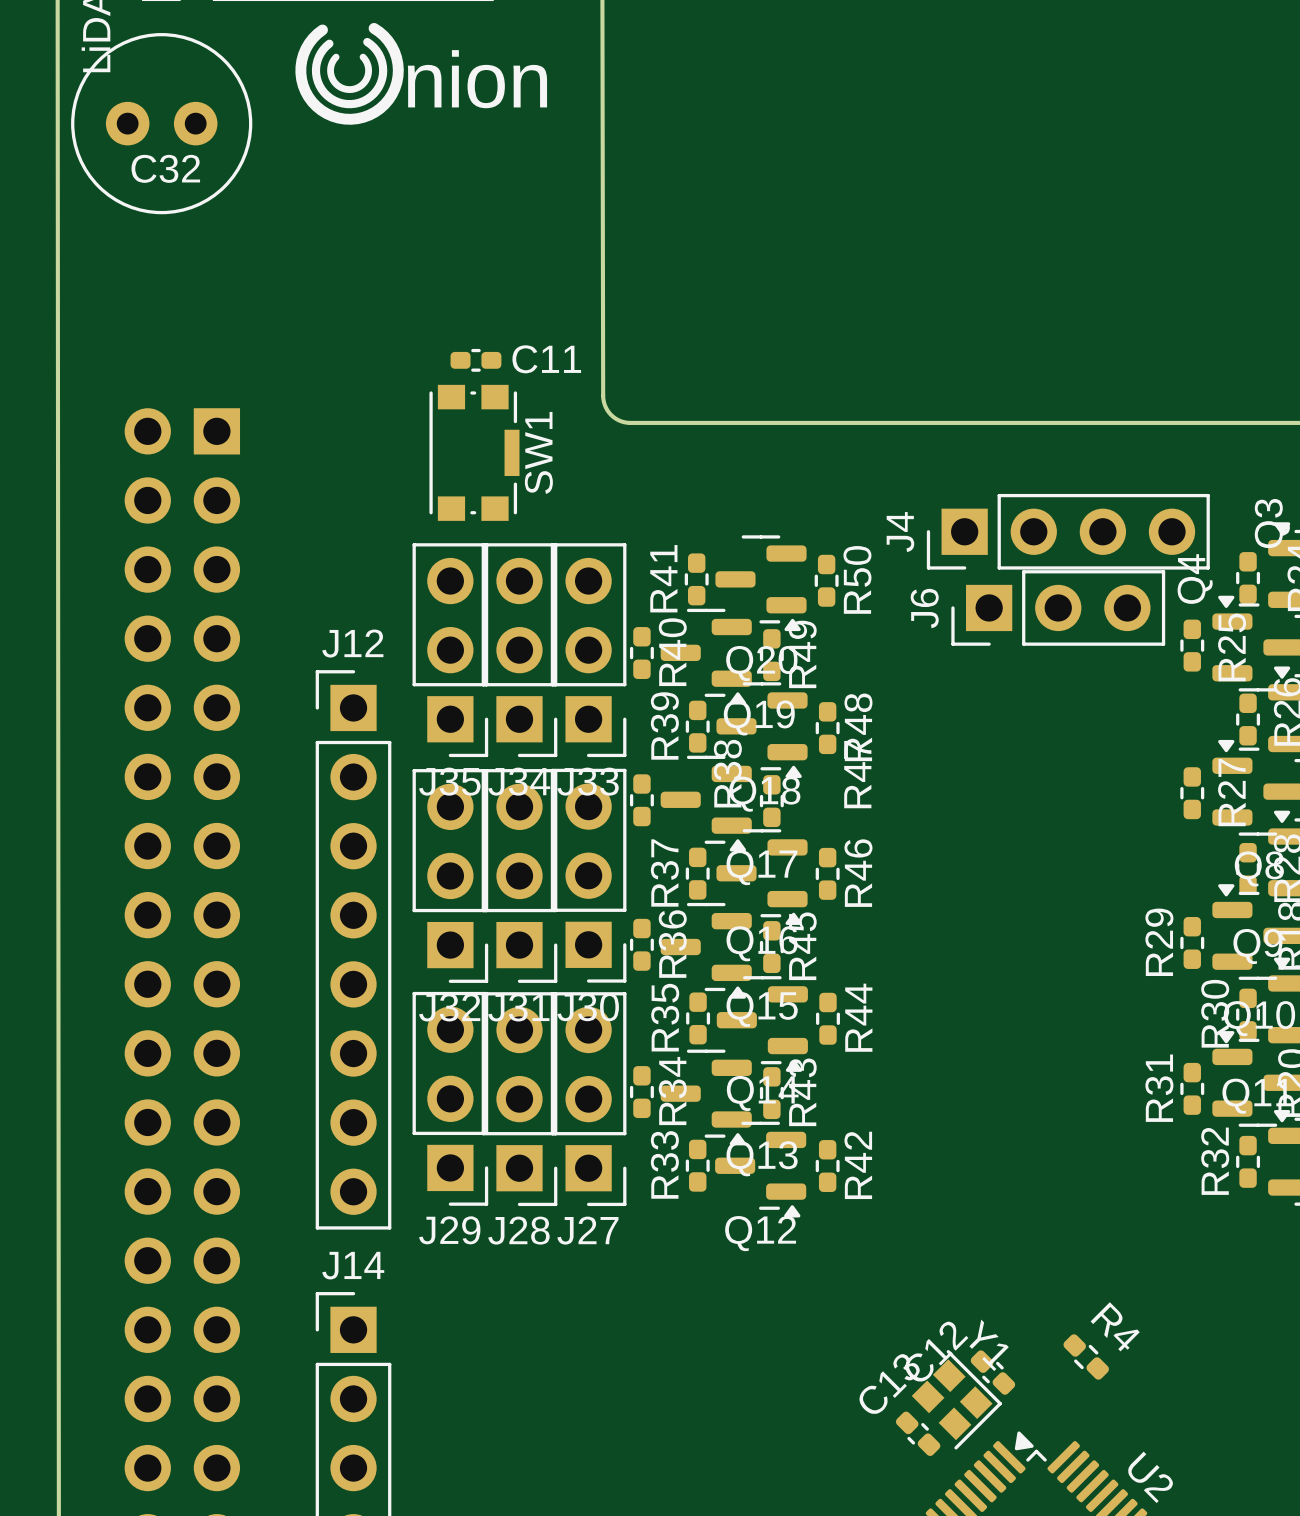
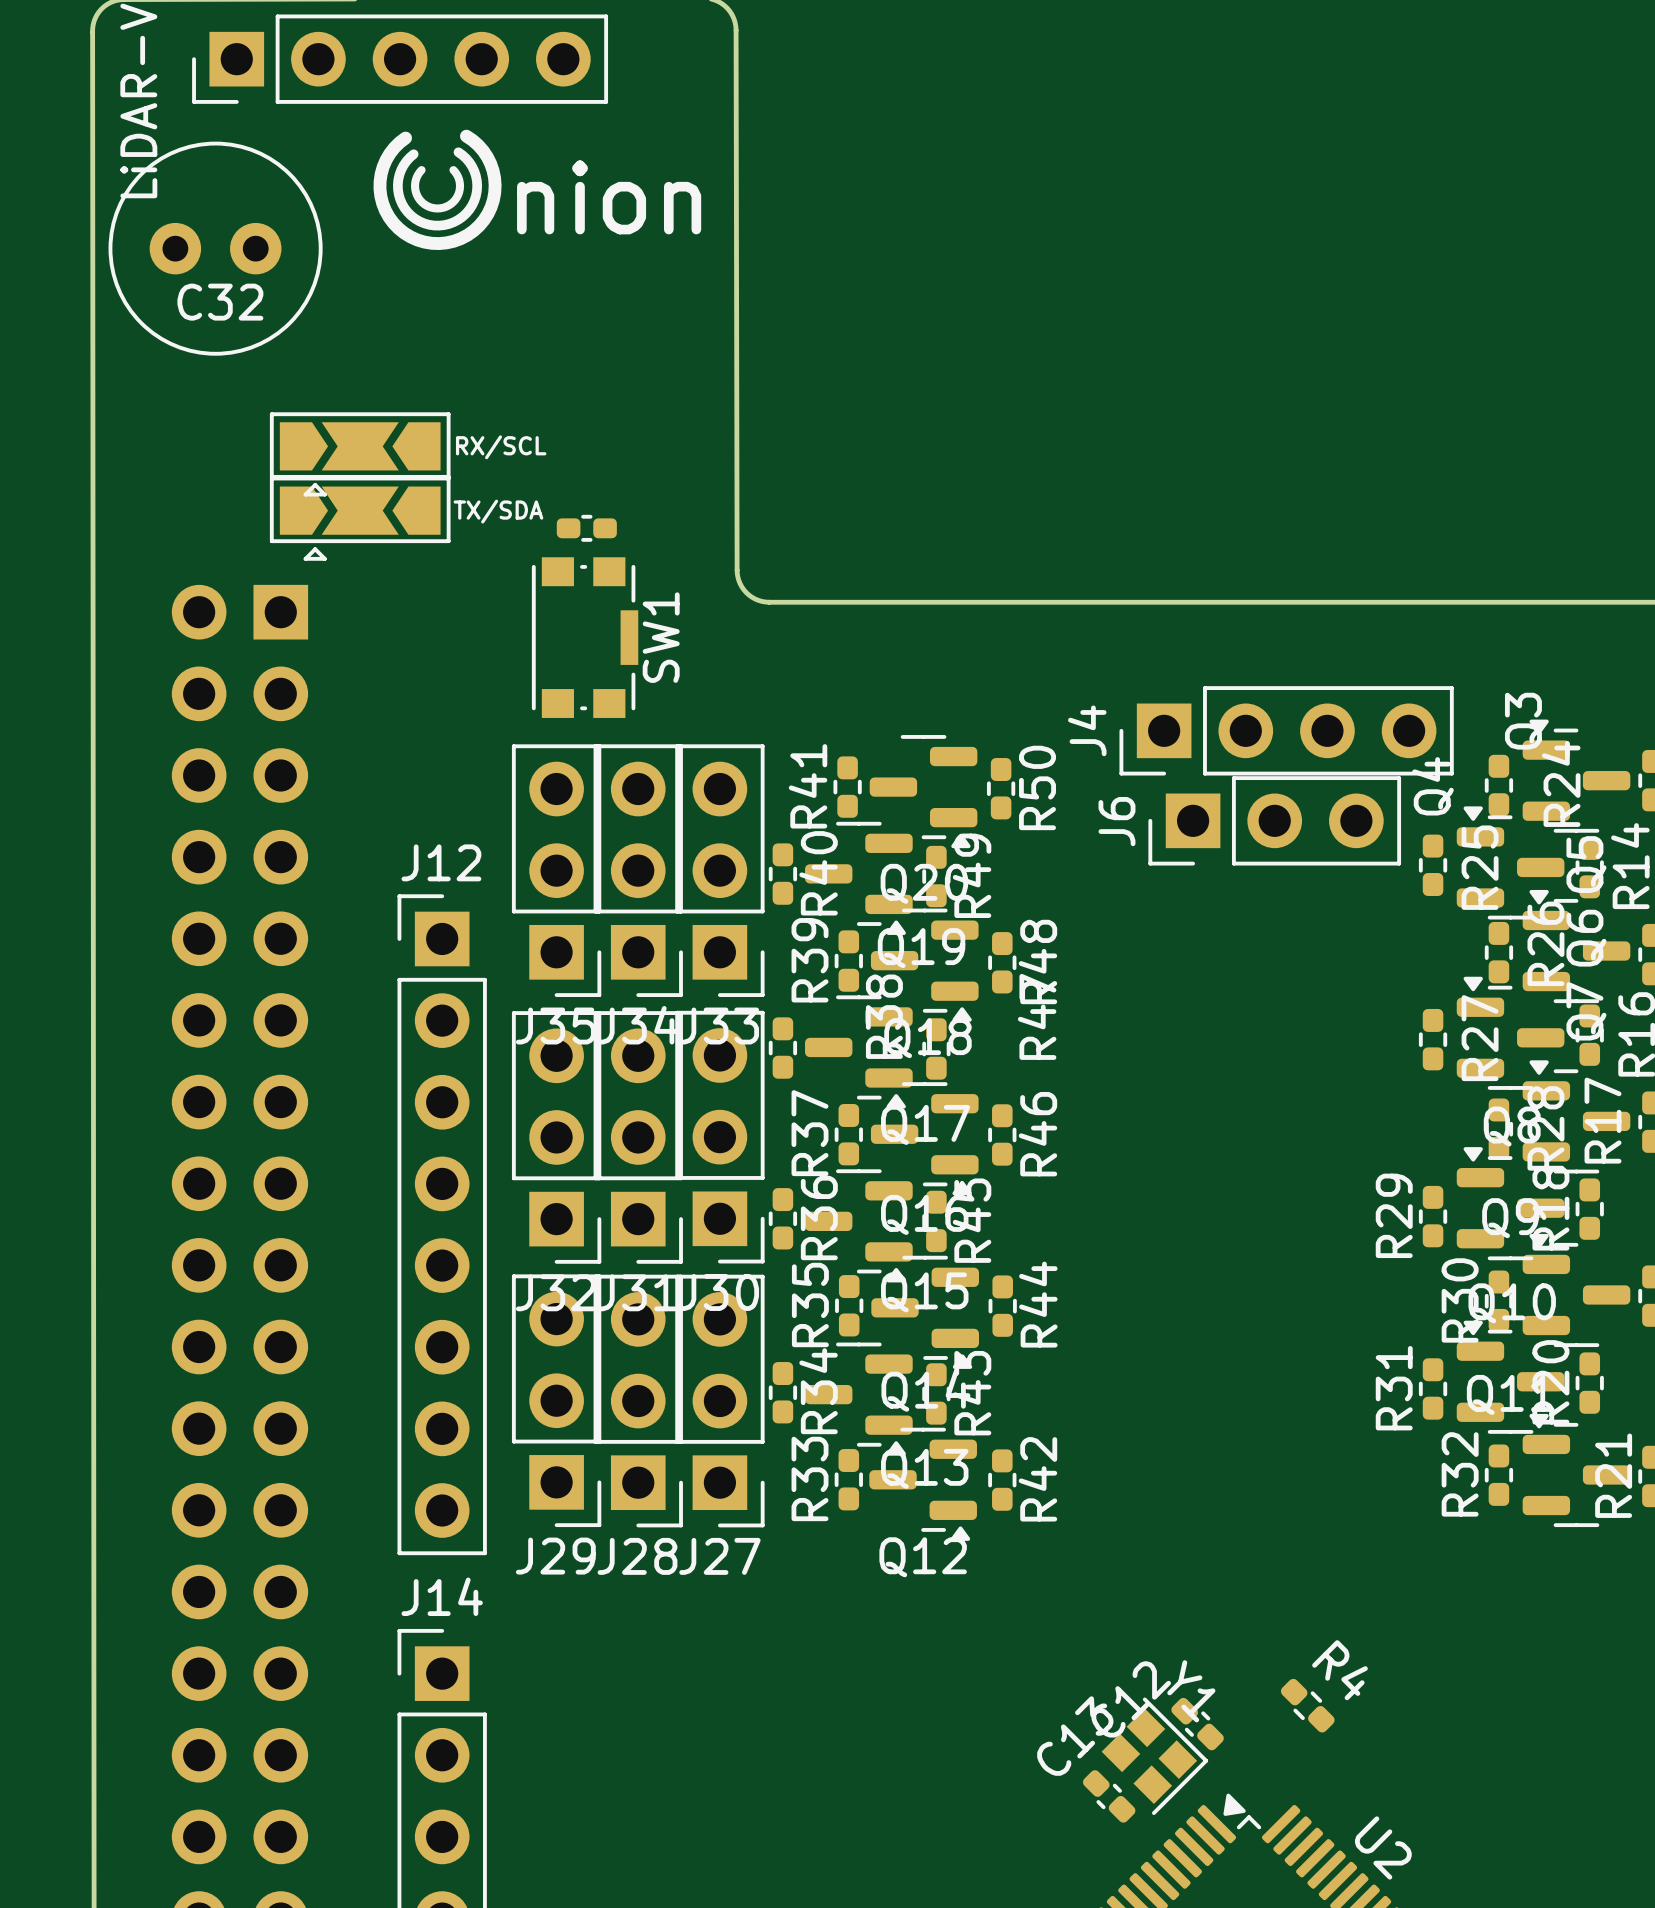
RX/SCL: none -> (360, 454)
TX/SDA: none -> (360, 518)
C11 name: C11 (546, 359) -> none

